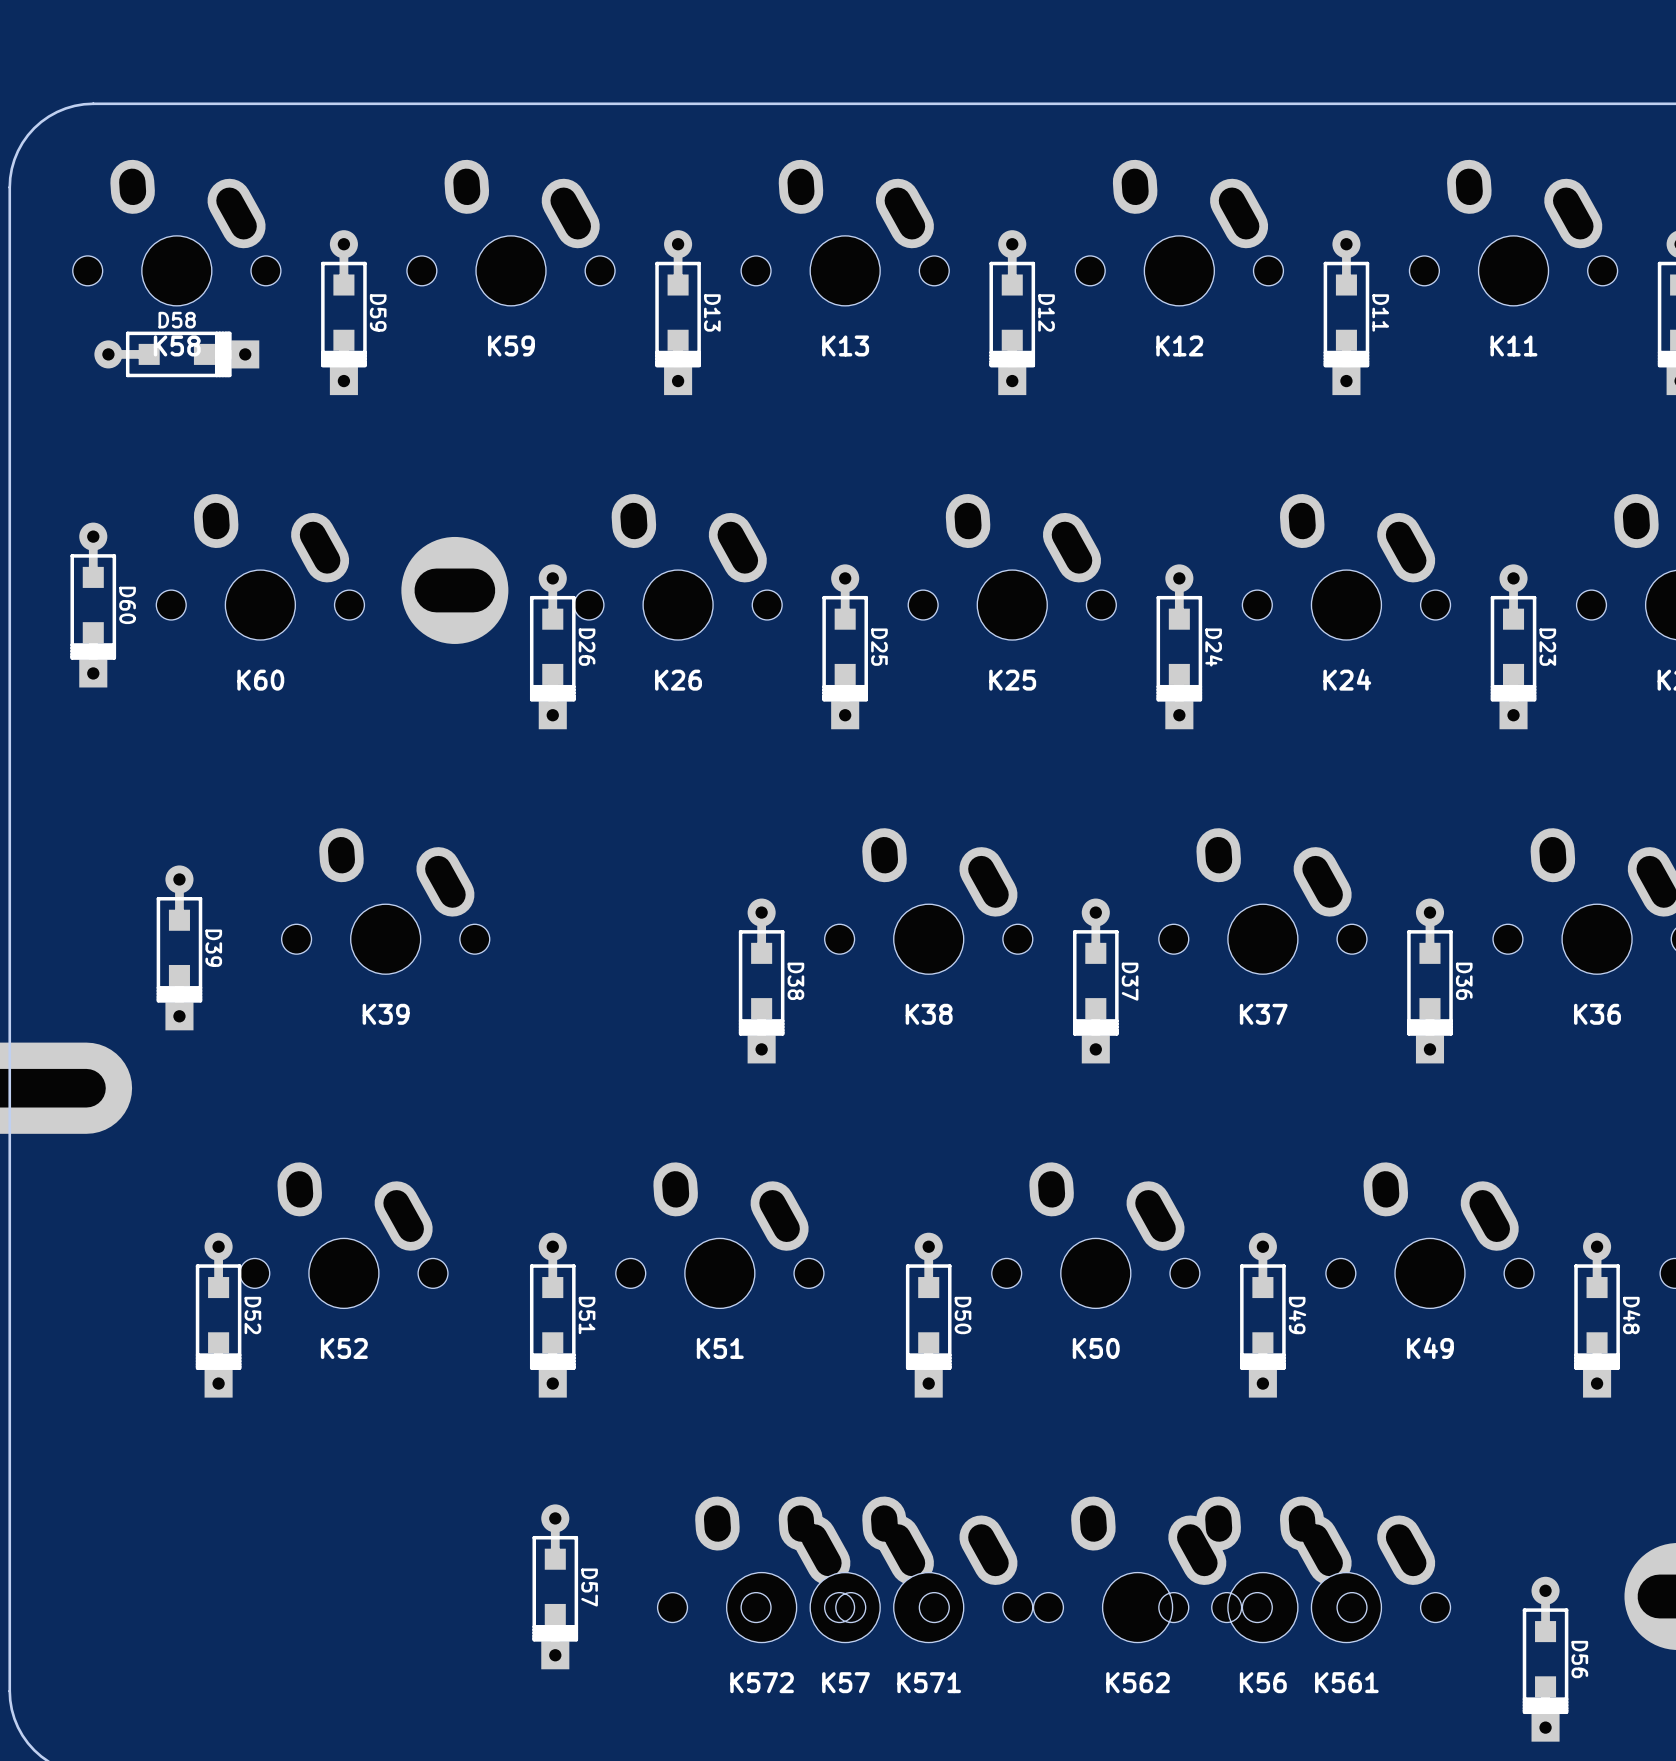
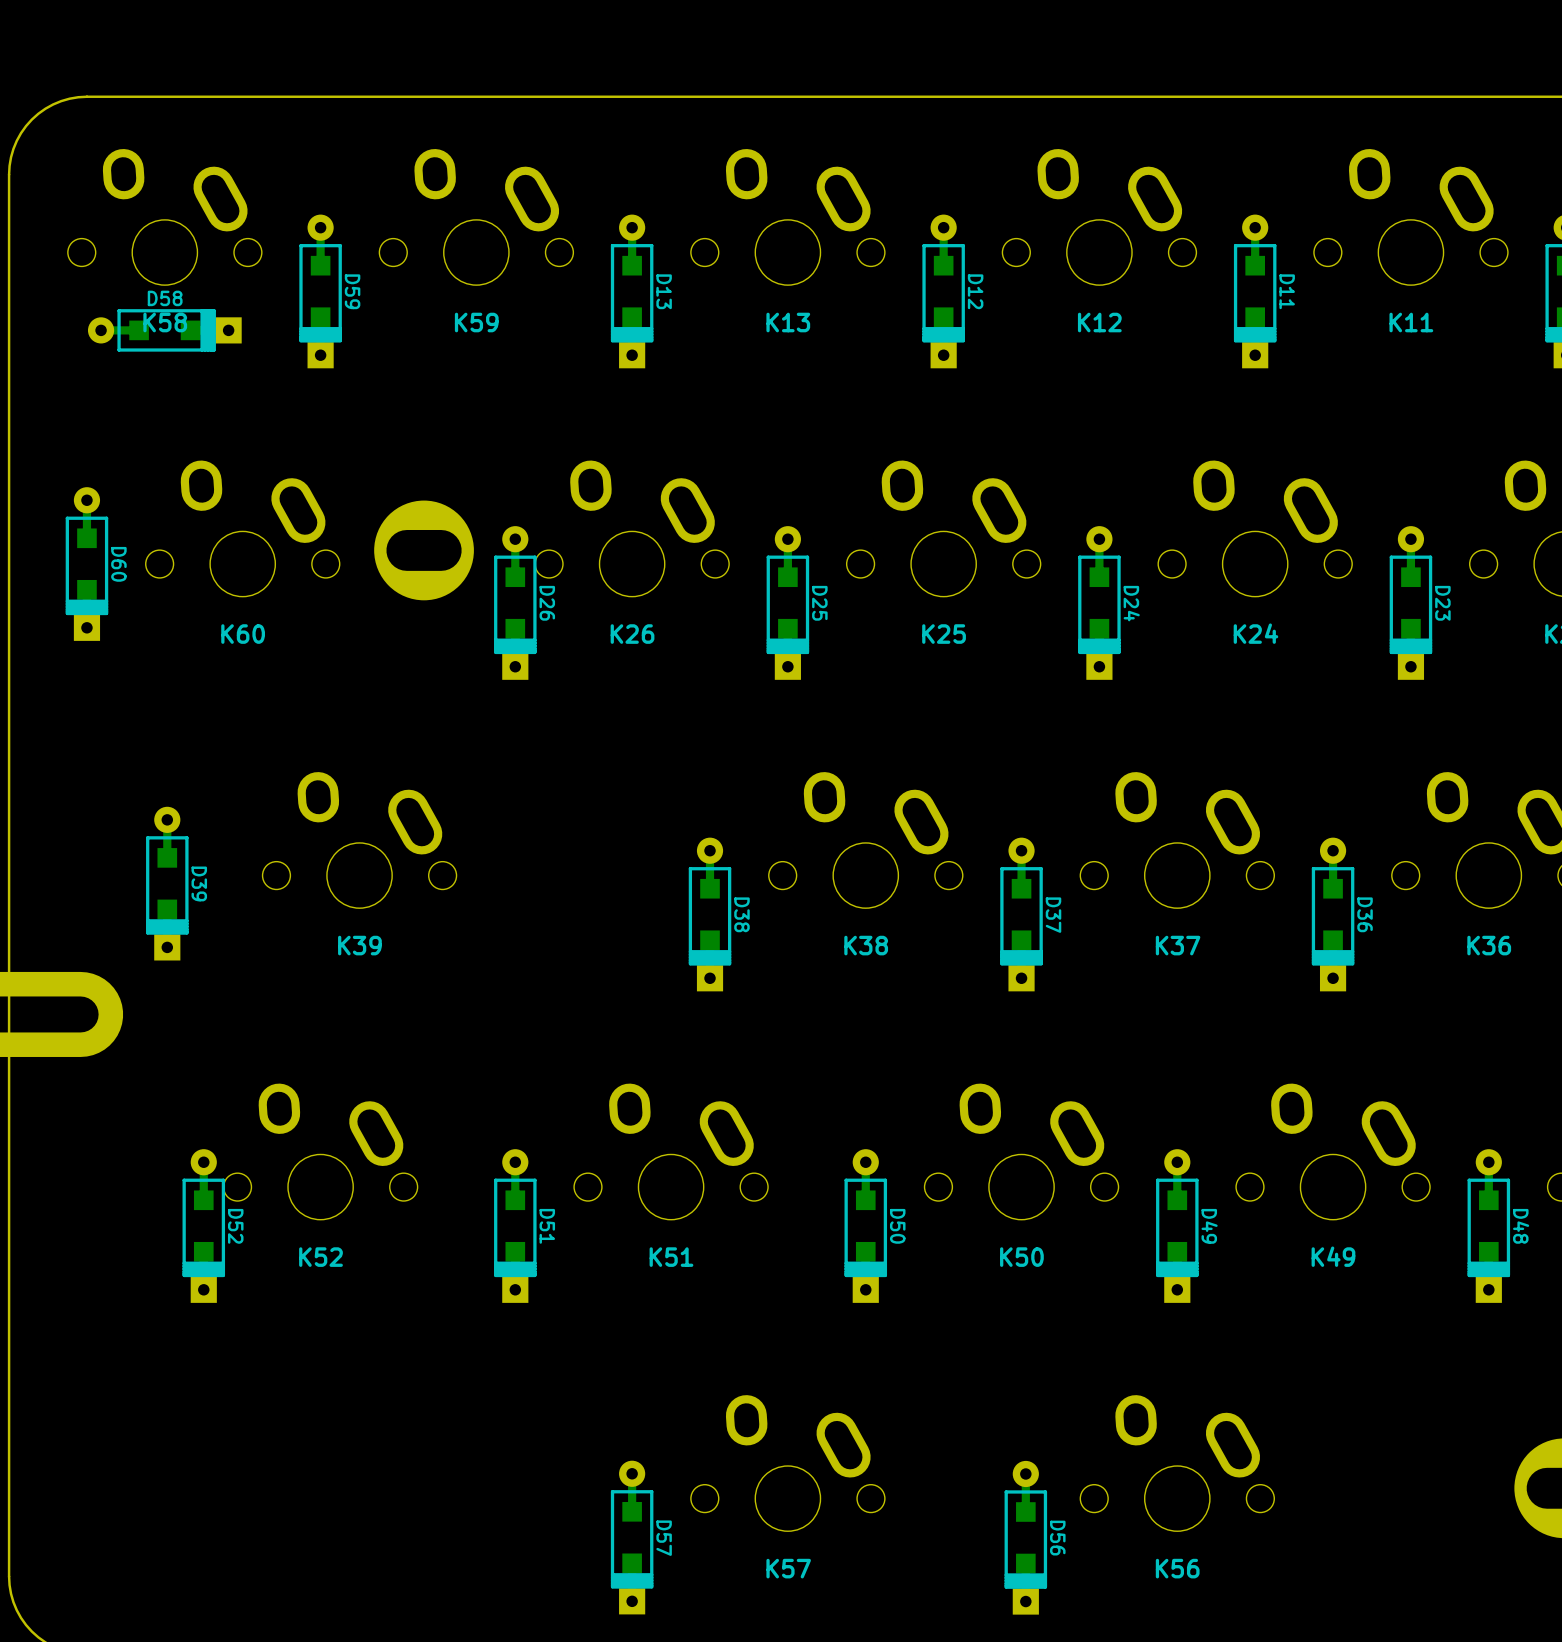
K572: (761, 1569) -> none
K571: (928, 1569) -> none
K562: (1137, 1569) -> none
K561: (1346, 1569) -> none
D57 position: (555, 1586) -> (632, 1537)
D56 position: (1545, 1659) -> (1025, 1537)

